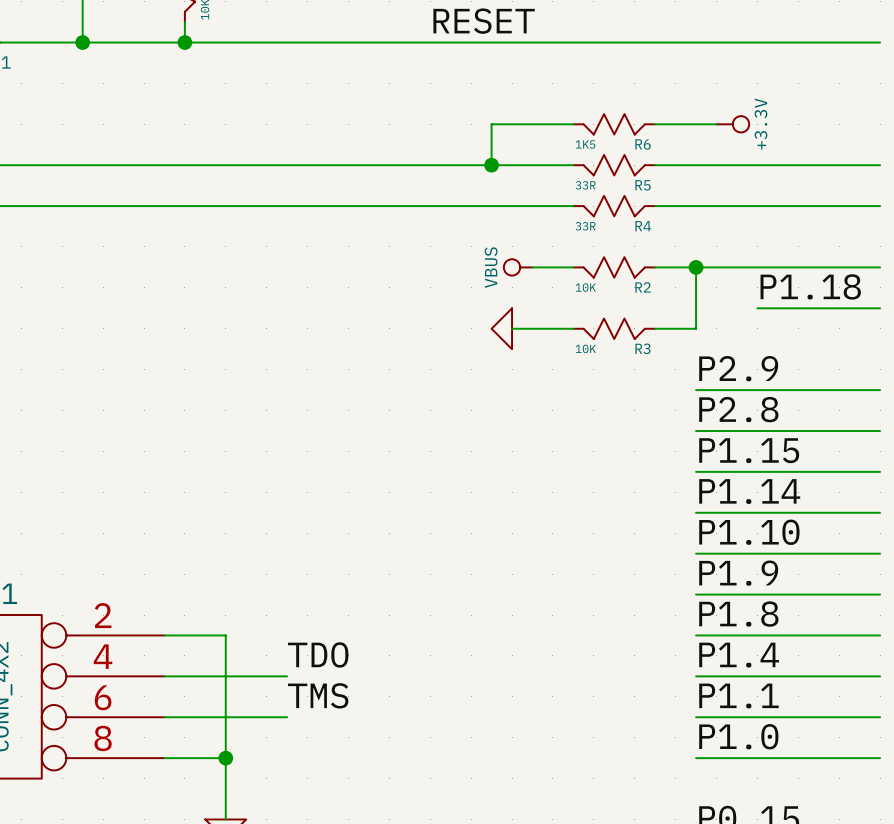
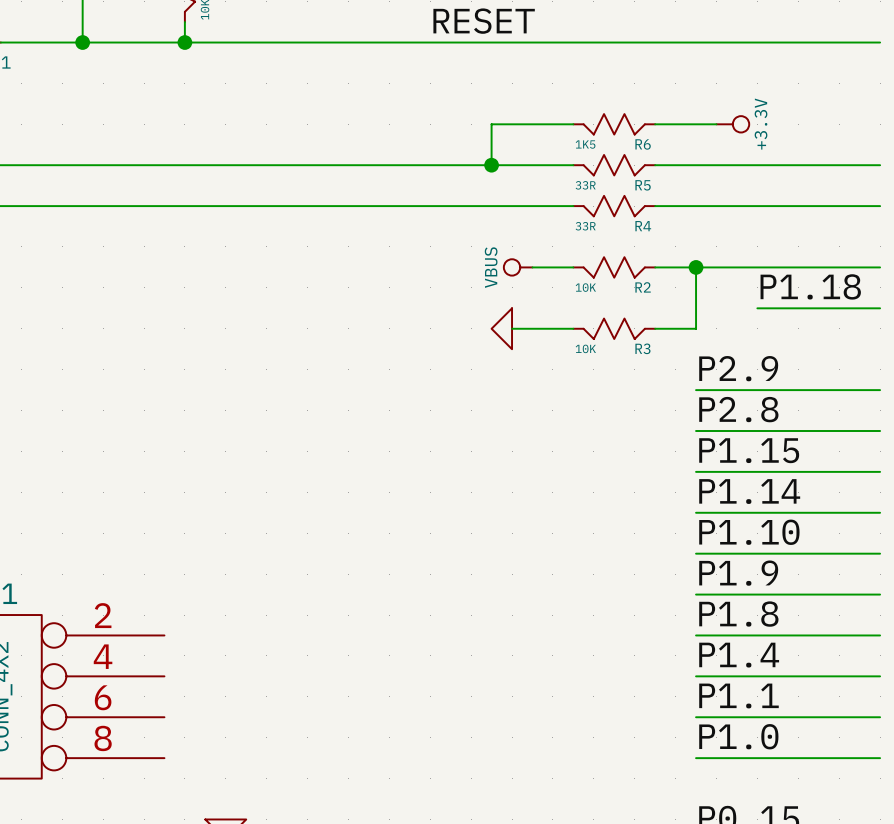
wire: (164, 635) (225, 635) (225, 819) -> none
label: TDO (318, 654) -> none
wire: (164, 676) (287, 676) -> none
label: TMS (318, 695) -> none
wire: (164, 717) (287, 717) -> none
wire: (164, 758) (225, 758) -> none
junction: (225, 758) -> none

